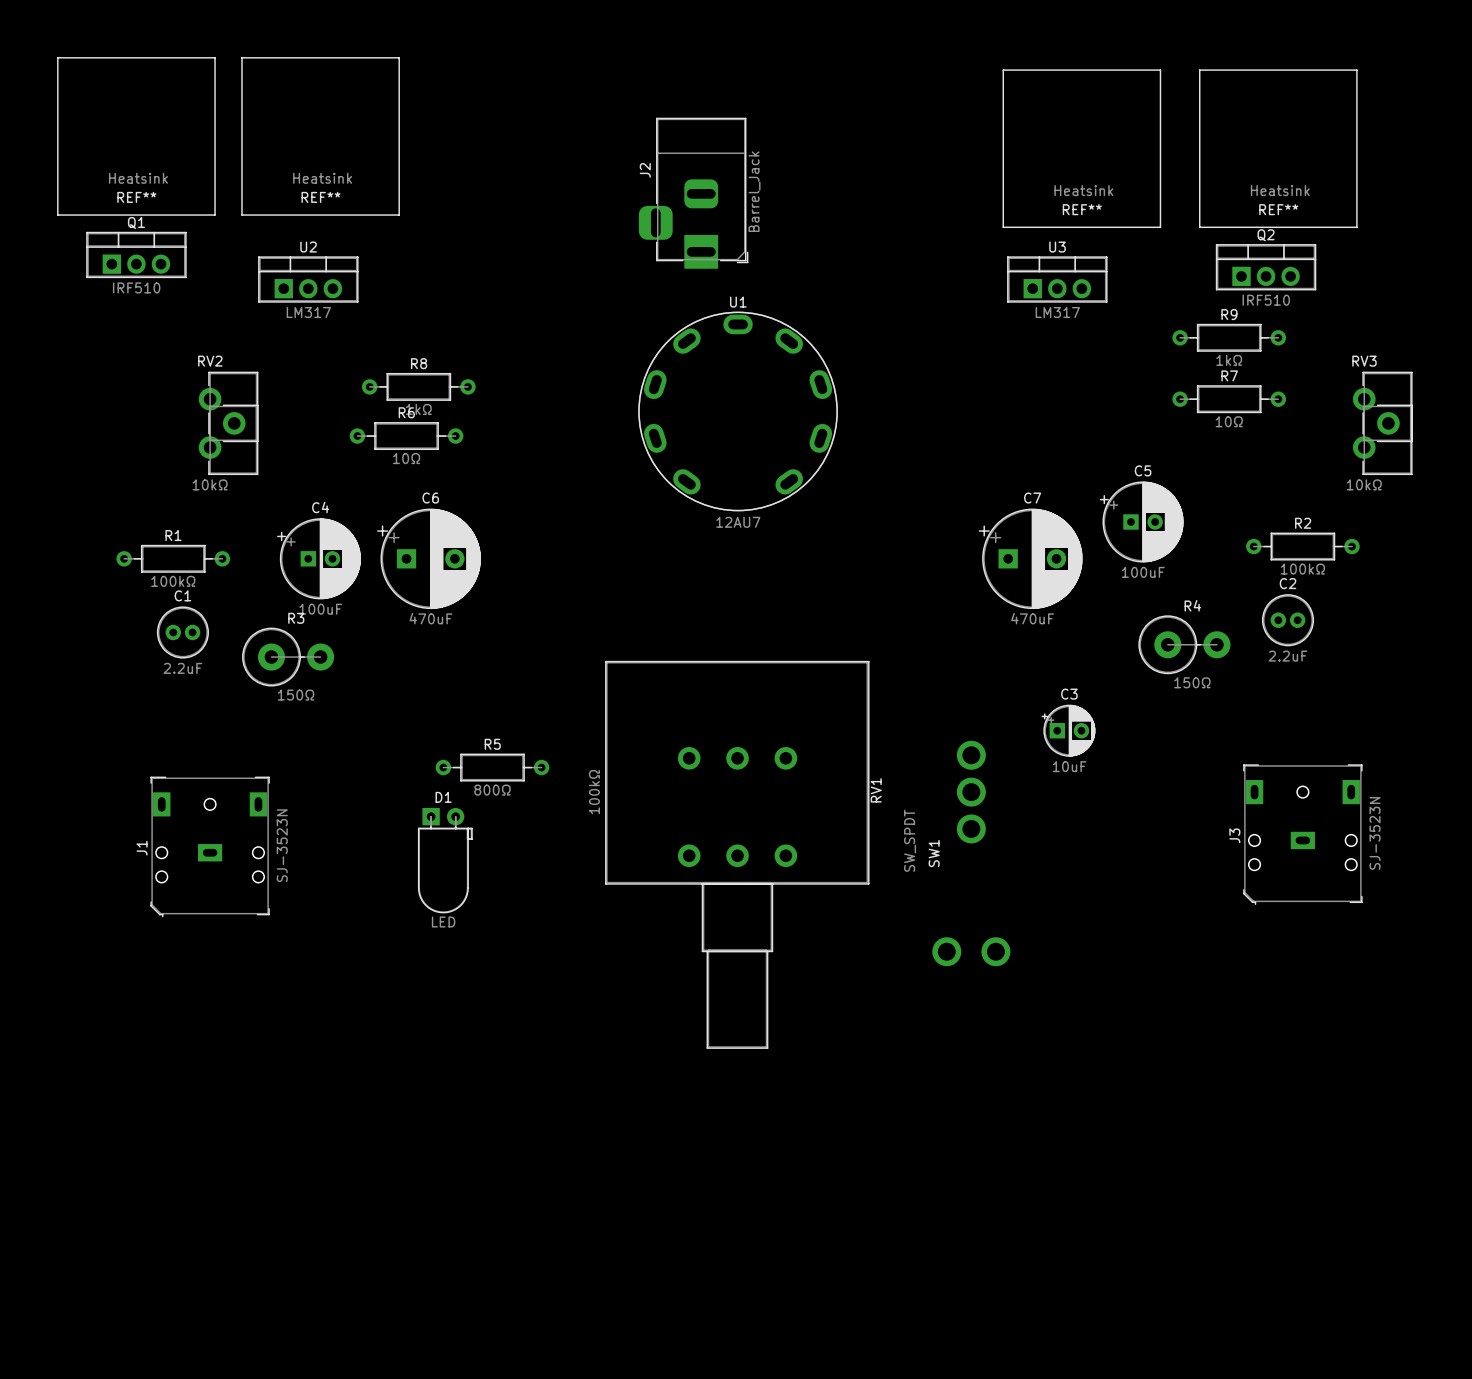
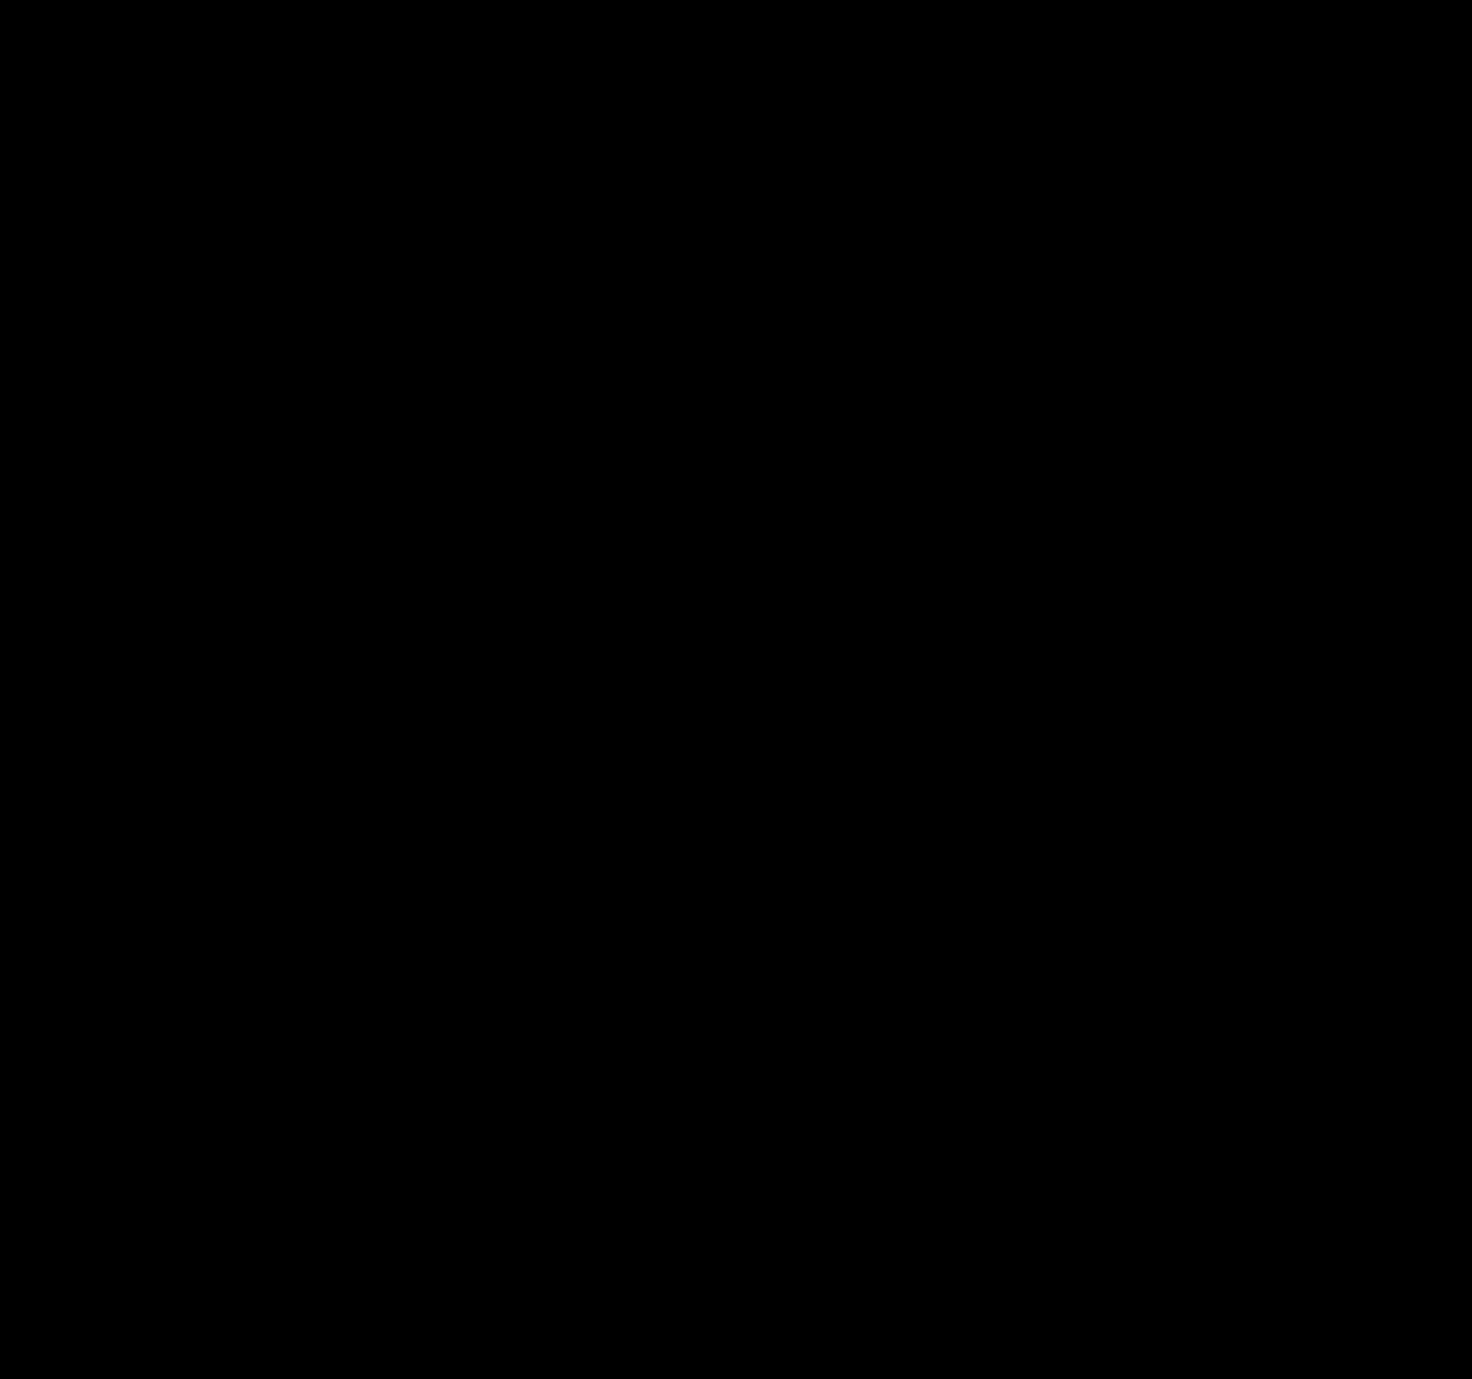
REF**: Heatsink (136, 136) -> none
REF**: Heatsink (320, 136) -> none
REF**: Heatsink (1081, 148) -> none
REF**: Heatsink (1278, 148) -> none
J2: Barrel_Jack (693, 193) -> none
Q1: IRF510 (136, 254) -> none
Q2: IRF510 (1266, 267) -> none
U2: LM317 (308, 279) -> none
U3: LM317 (1057, 279) -> none
R9: 1kΩ (1229, 337) -> none
R8: 1kΩ (418, 386) -> none
R7: 10Ω (1229, 399) -> none
U1: 12AU7 (738, 411) -> none
RV2: 10kΩ (228, 423) -> none
RV3: 10kΩ (1382, 423) -> none
R6: 10Ω (406, 436) -> none
C5: 100uF (1141, 521) -> none
R2: 100kΩ (1302, 546) -> none
R1: 100kΩ (173, 558) -> none
C4: 100uF (319, 558) -> none
C6: 470uF (428, 558) -> none
C7: 470uF (1030, 558) -> none
C2: 2.2uF (1287, 620) -> none
C1: 2.2uF (182, 632) -> none
R4: 150Ω (1184, 644) -> none
R3: 150Ω (288, 657) -> none
C3: 10uF (1068, 730) -> none
R5: 800Ω (492, 767) -> none
J3: SJ-3523N (1302, 834) -> none
J1: SJ-3523N (210, 846) -> none
SW1: SW_SPDT (971, 853) -> none
RV1: 100kΩ (737, 854) -> none
D1: LED (445, 860) -> none

